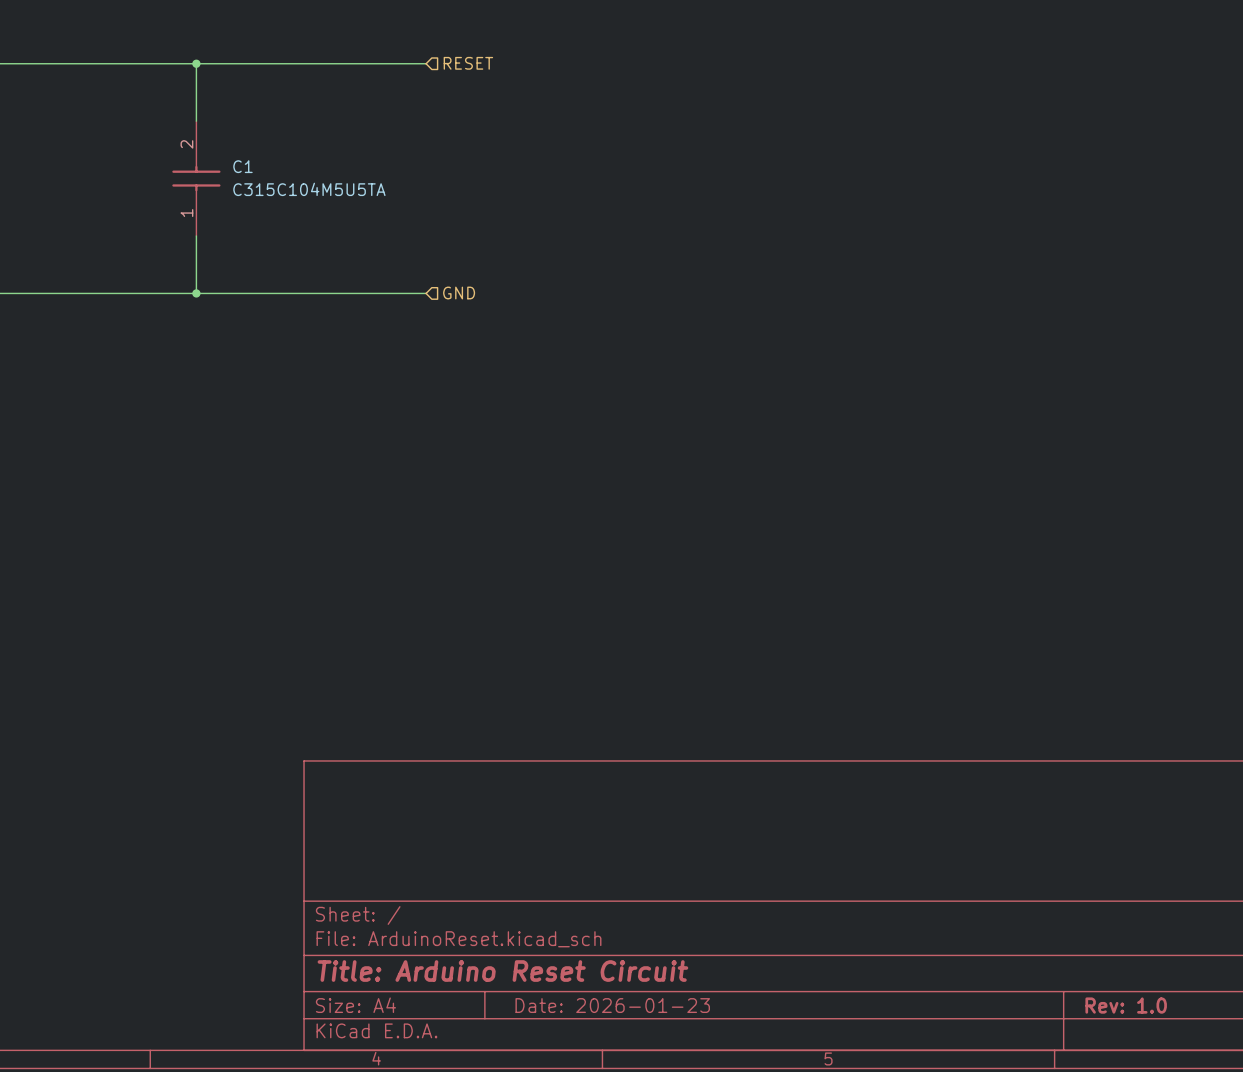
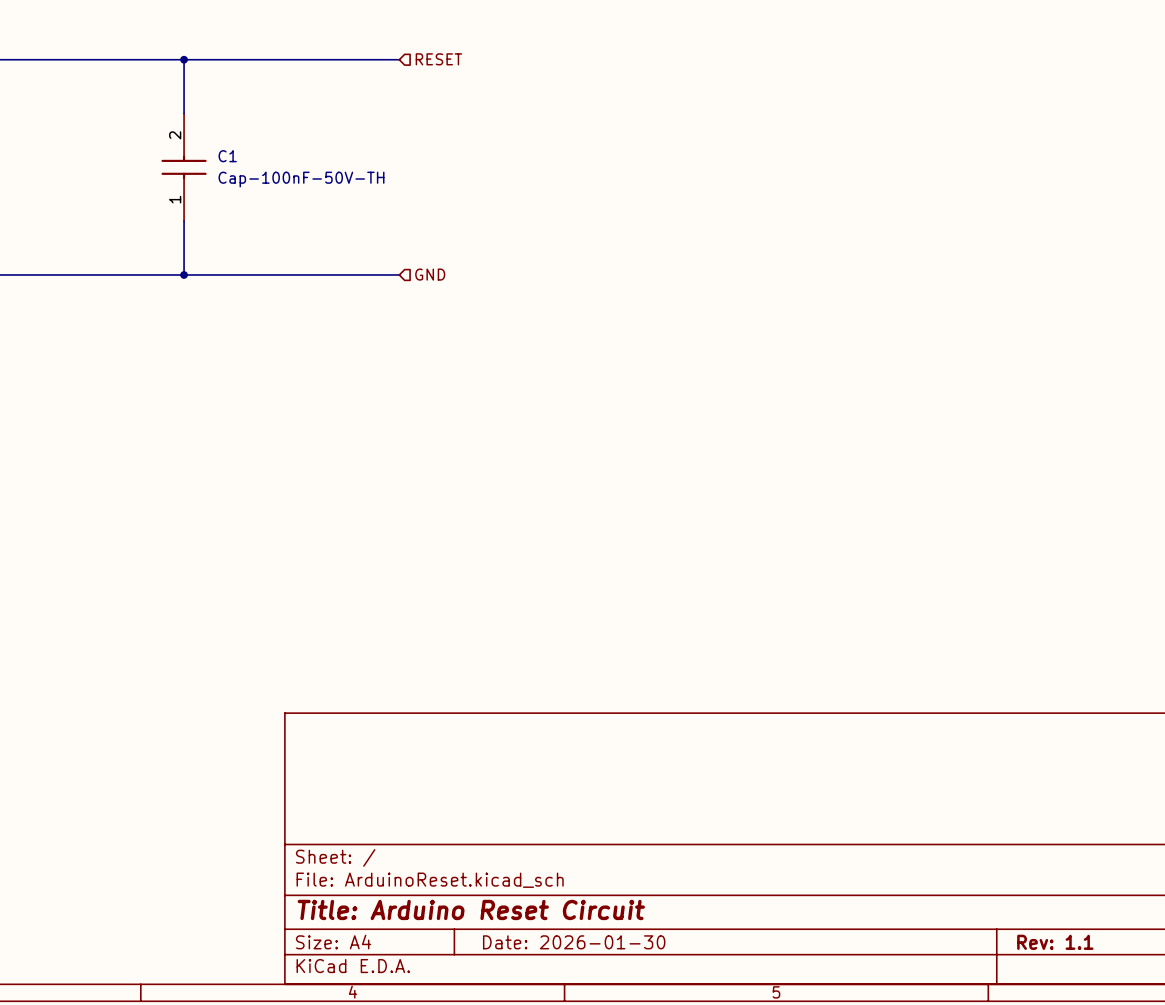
C1 value: C315C104M5U5TA (309, 189) -> Cap-100nF-50V-TH (301, 179)
title block: Date: 2026-01-23 (612, 1005) -> Date: 2026-01-30 (574, 942)
title block: Rev: 1.0 (1126, 1005) -> Rev: 1.1 (1055, 942)

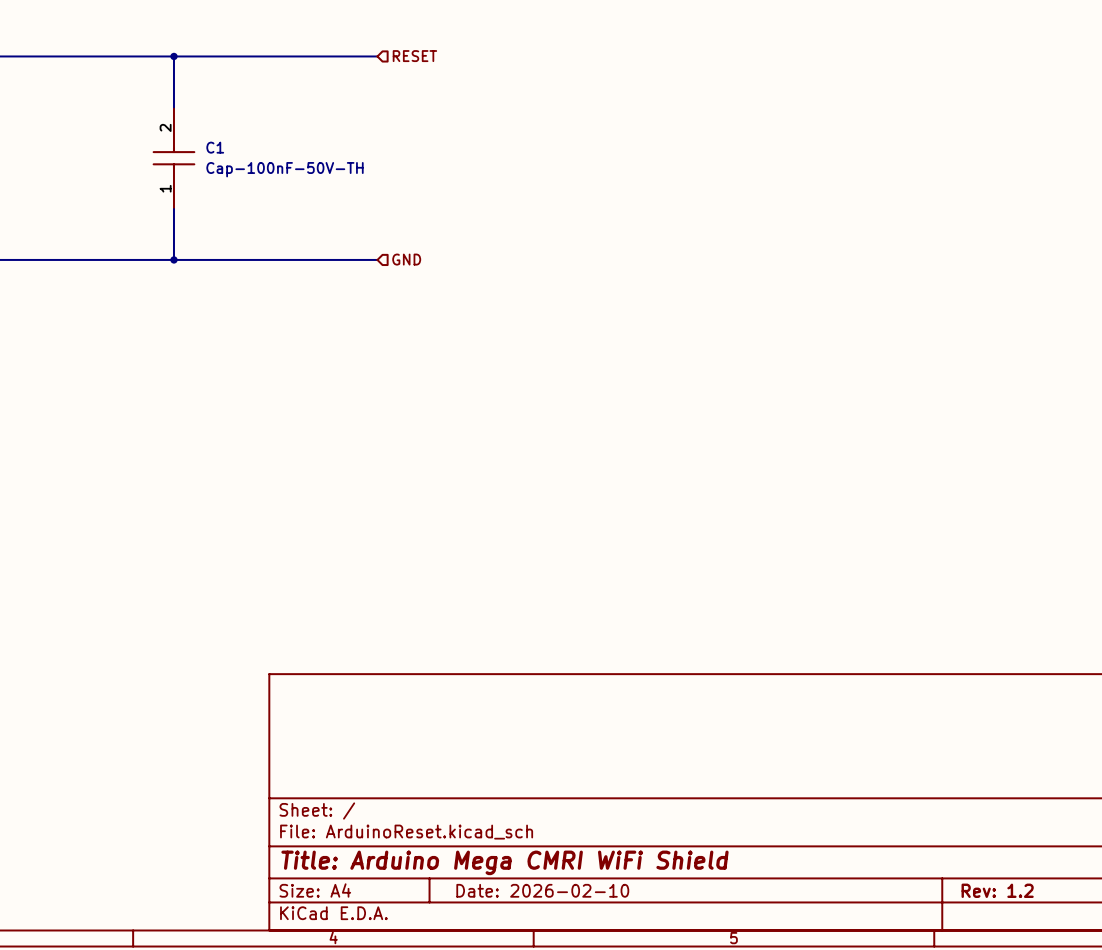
title block: Title: Arduino Reset Circuit (471, 909) -> Title: Arduino Mega CMRI WiFi Shield (504, 862)
title block: Date: 2026-01-30 (574, 942) -> Date: 2026-02-10 (542, 890)
title block: Rev: 1.1 (1055, 942) -> Rev: 1.2 (997, 890)

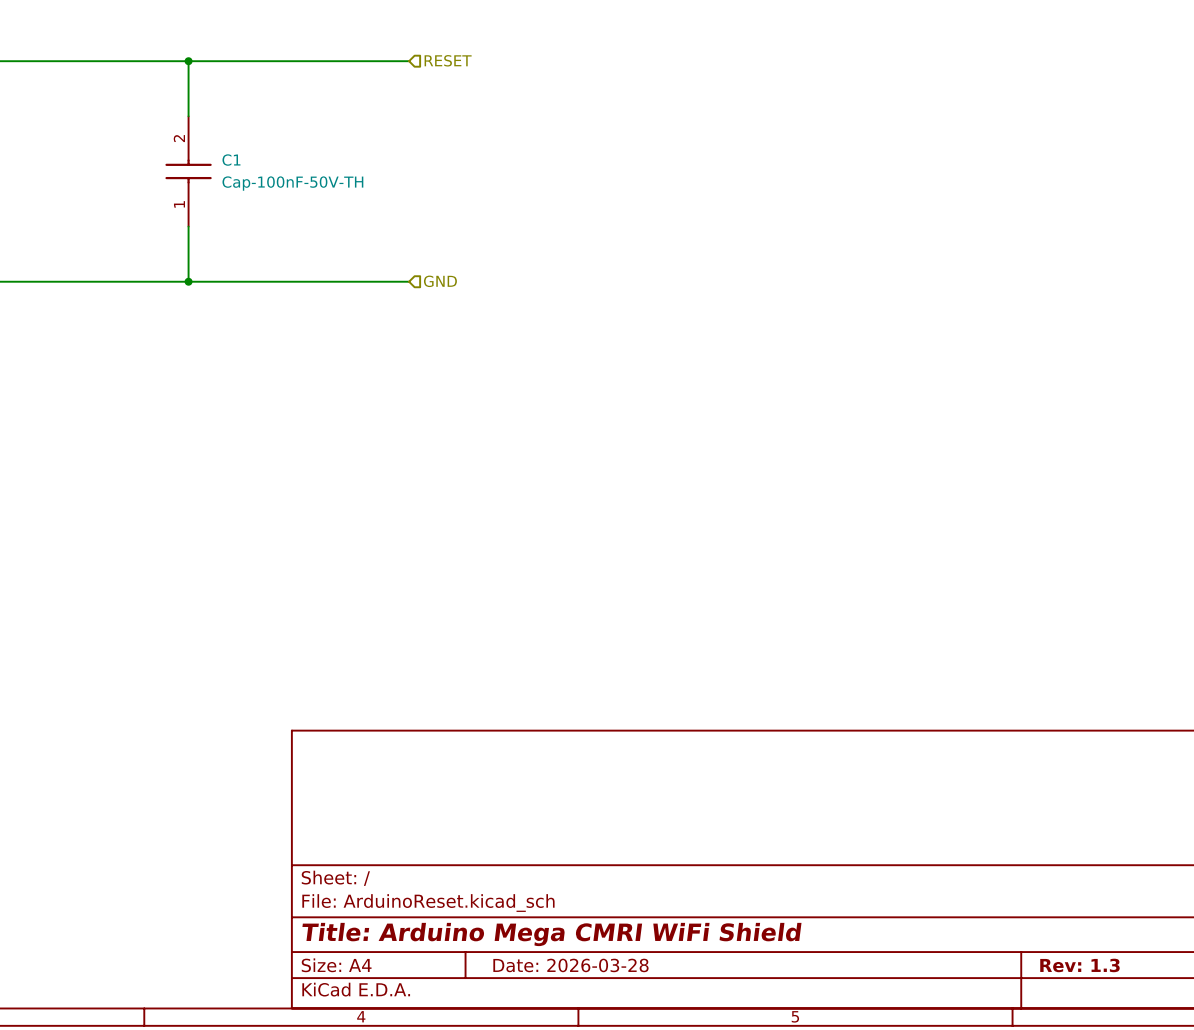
title block: Date: 2026-02-10 (542, 890) -> Date: 2026-03-28 (570, 965)
title block: Rev: 1.2 (997, 890) -> Rev: 1.3 (1079, 965)

